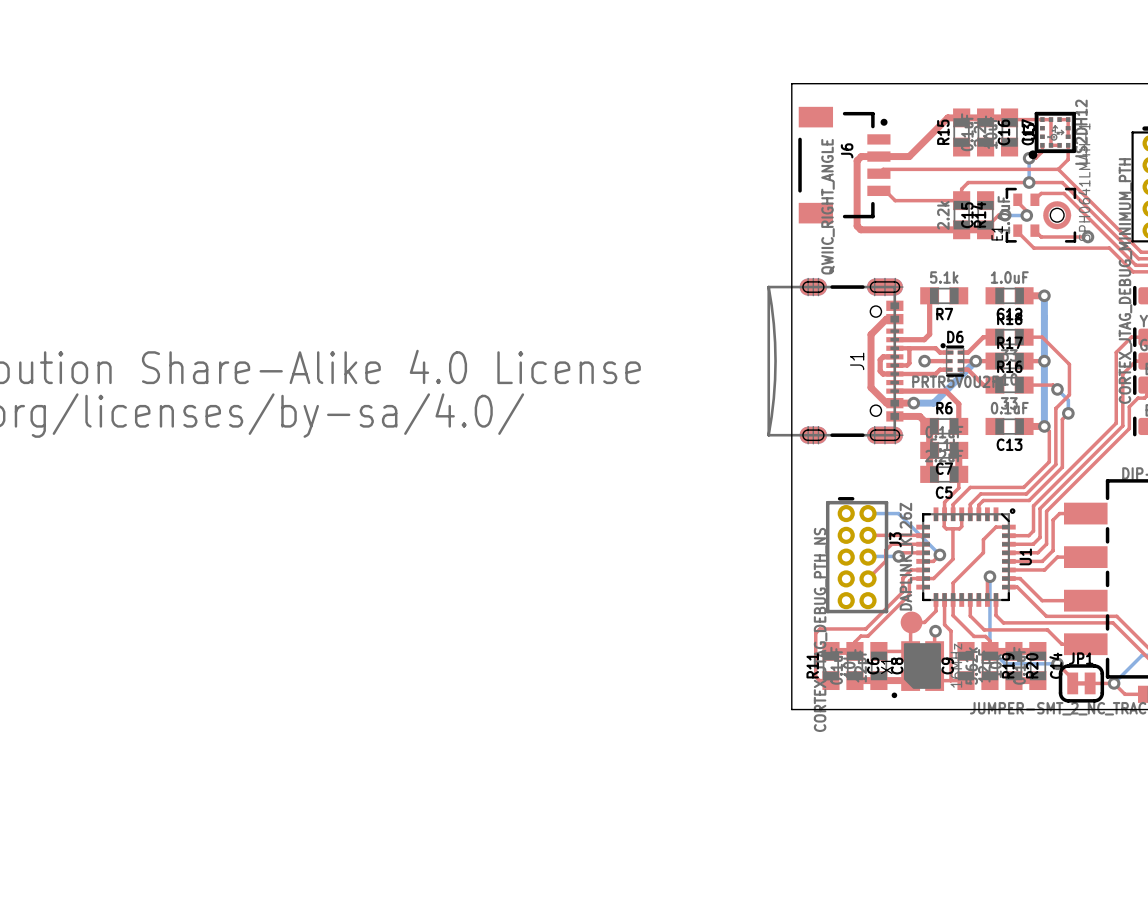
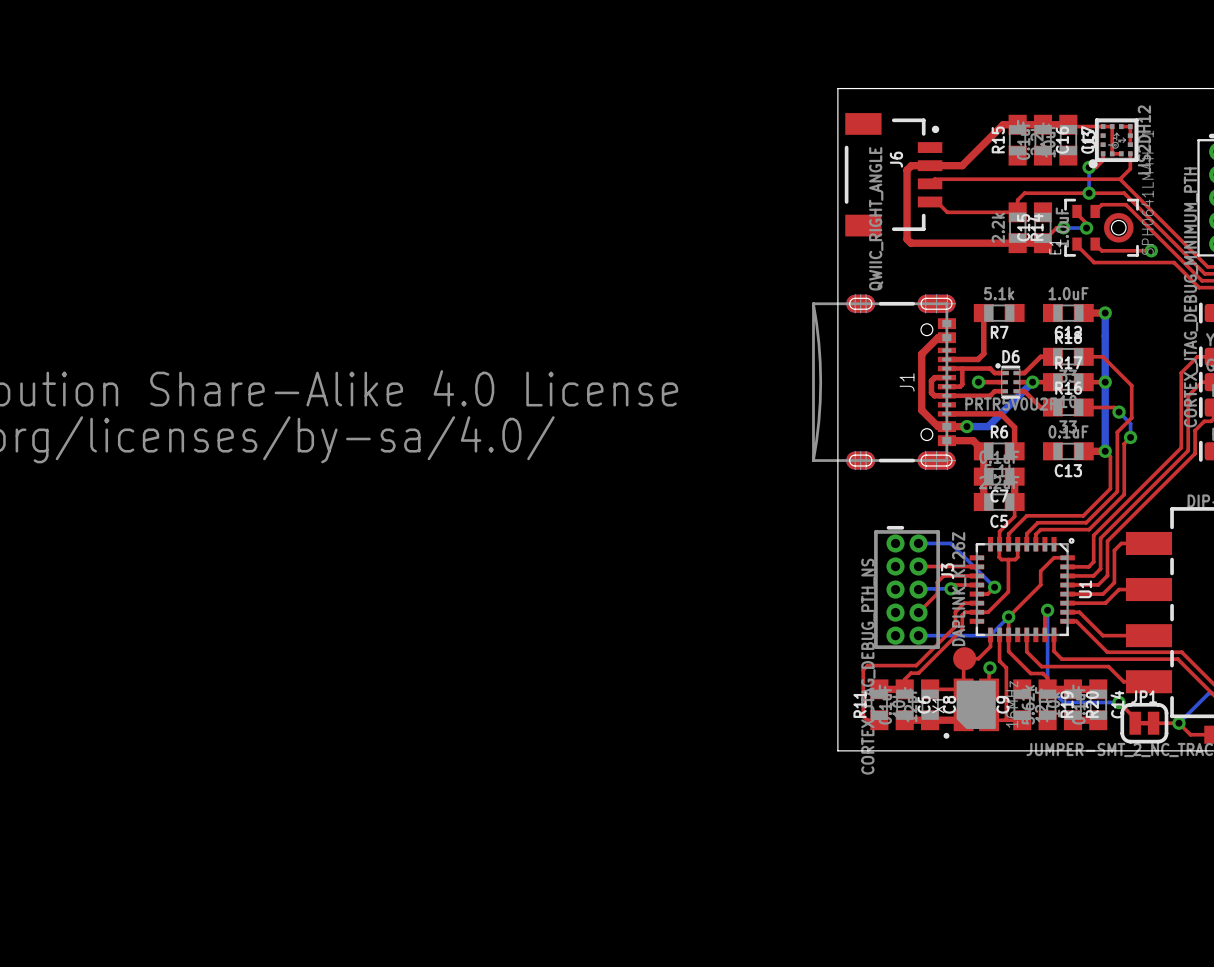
bottom track: none -> (1008, 616) (989, 635) (918, 635)
via: none -> (1008, 616)

